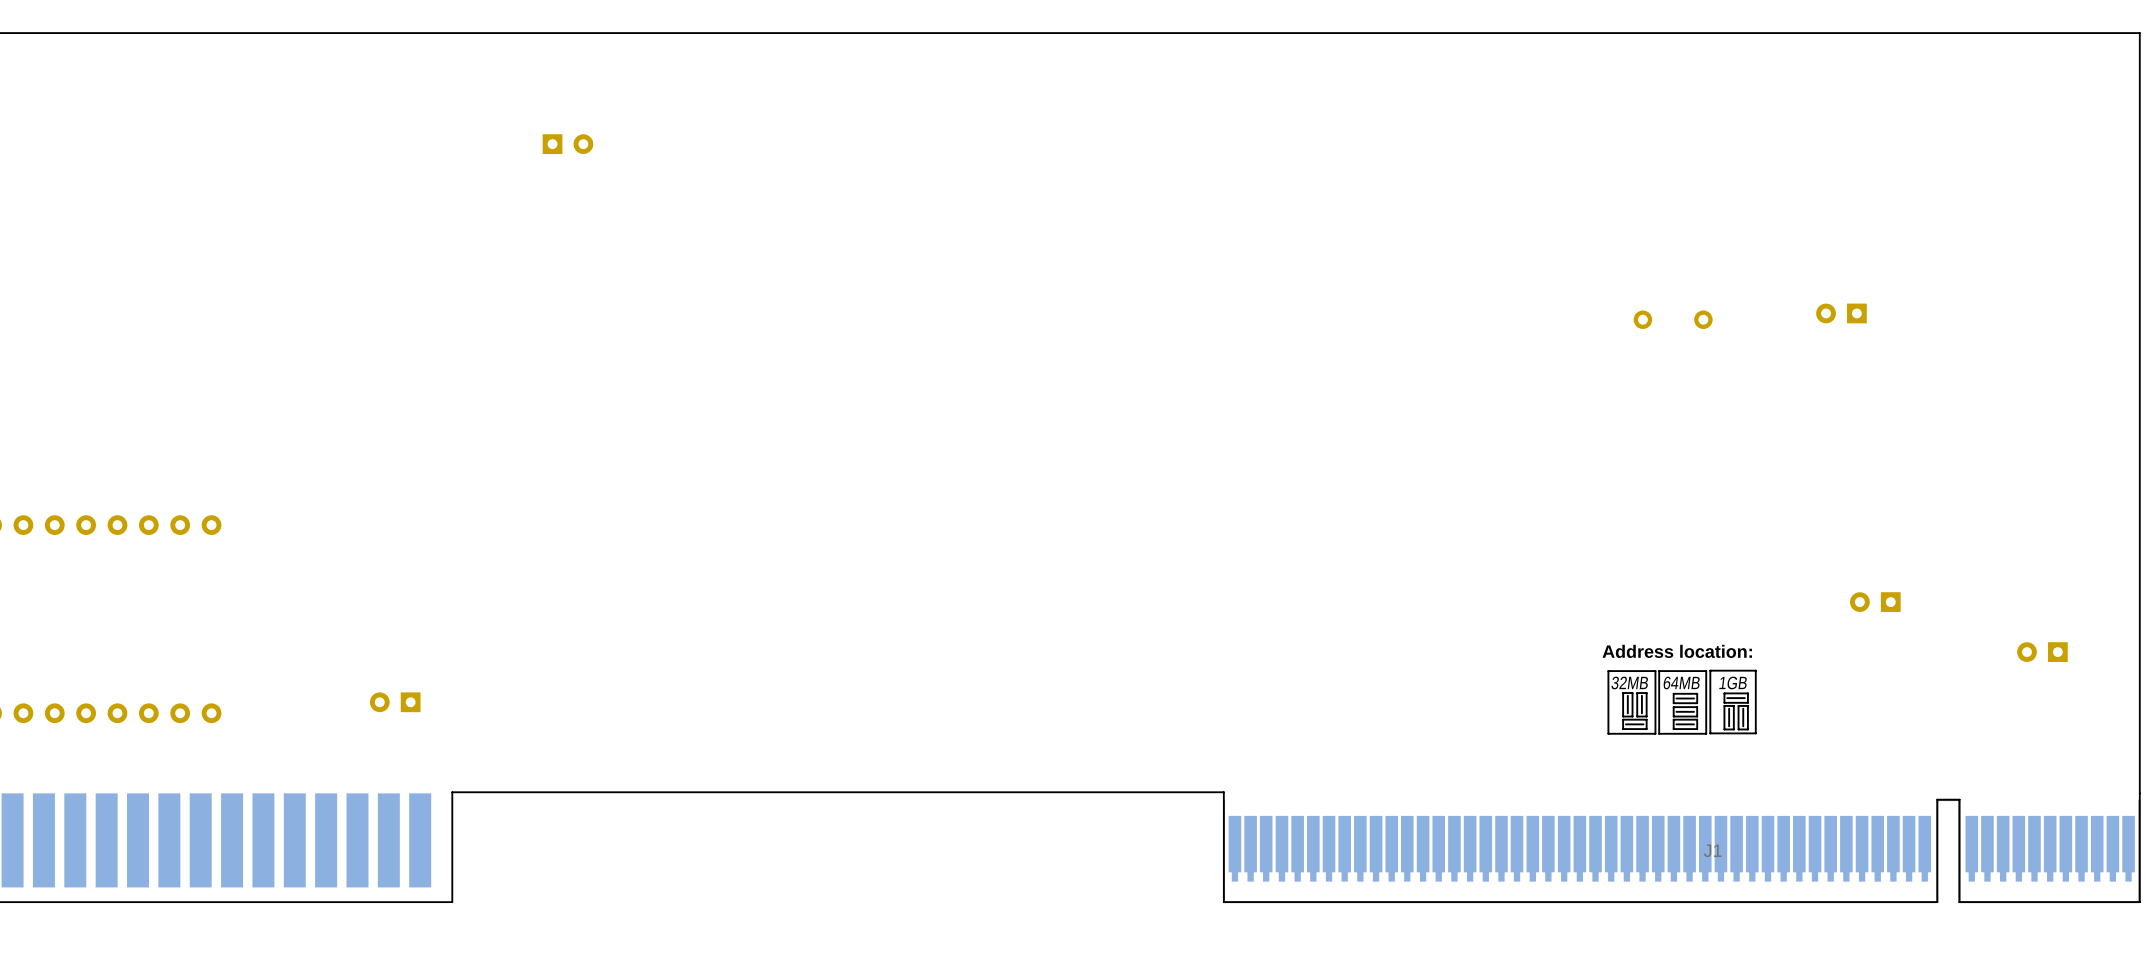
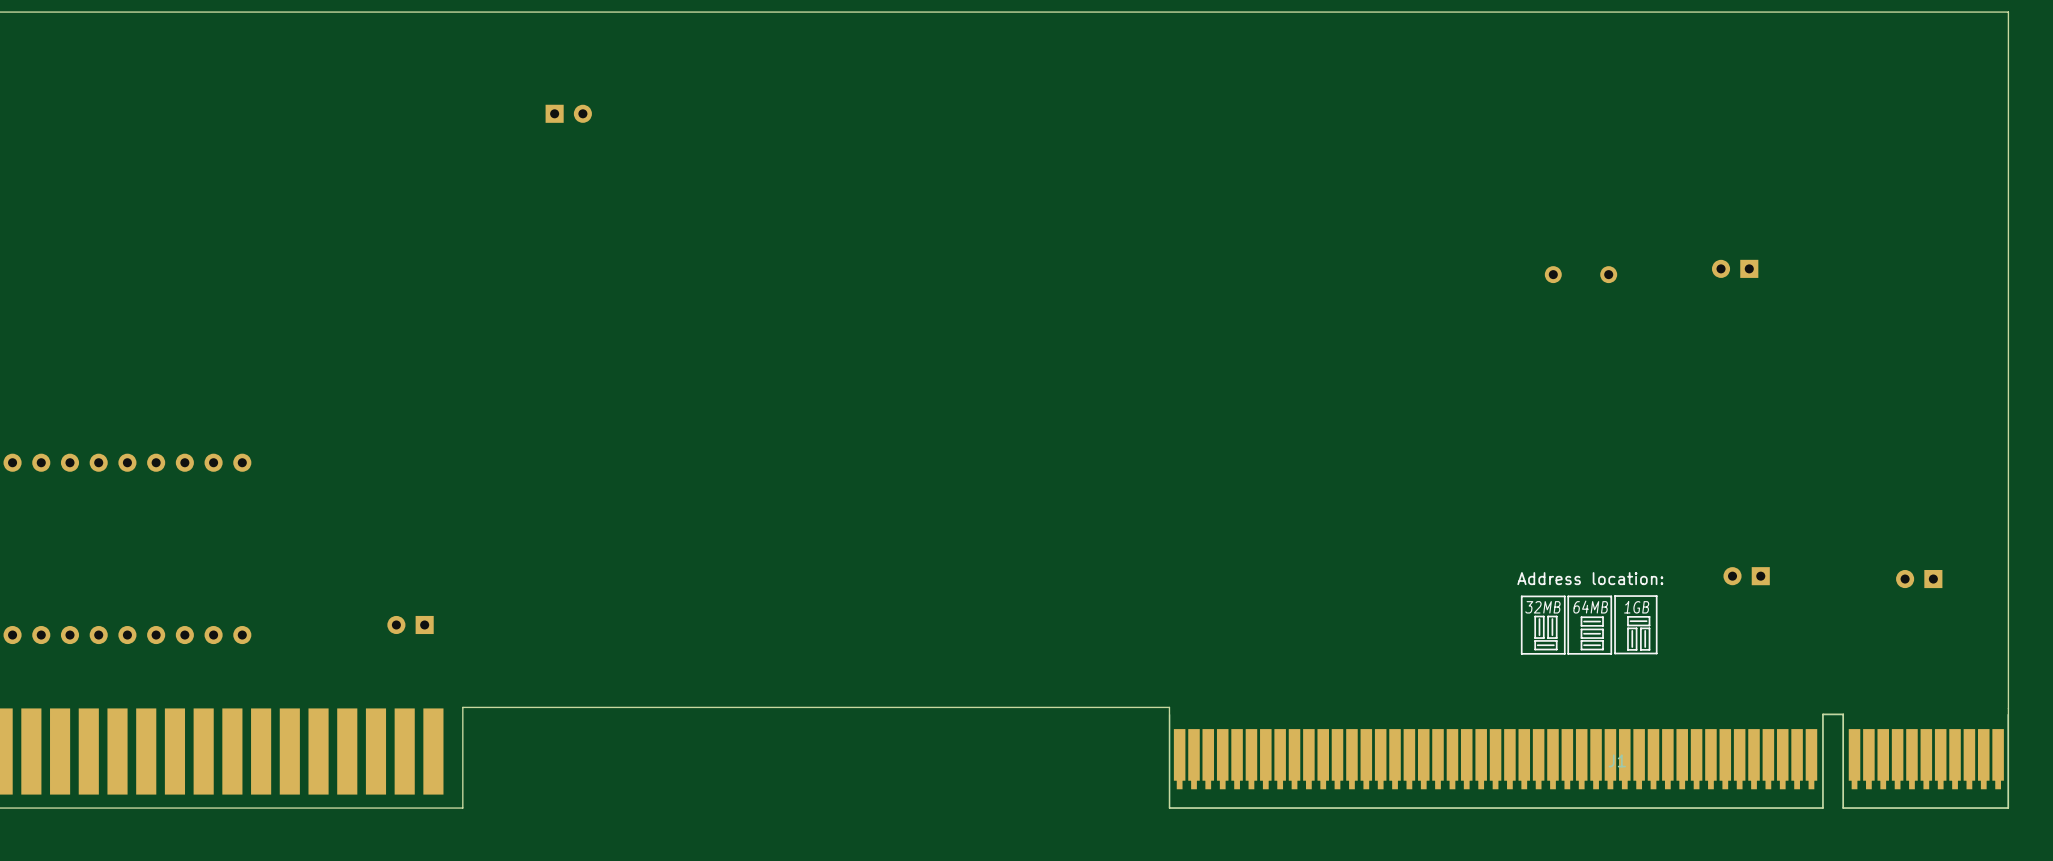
part position: (1875, 602) -> (1746, 576)

